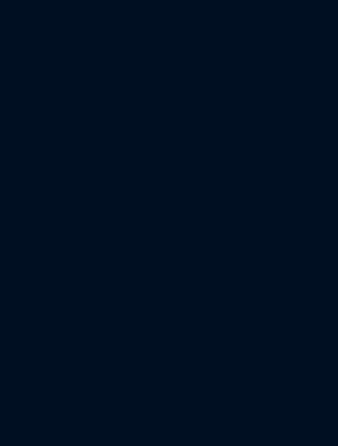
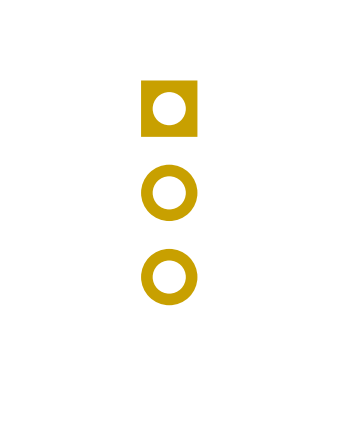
part: none -> (169, 192)

